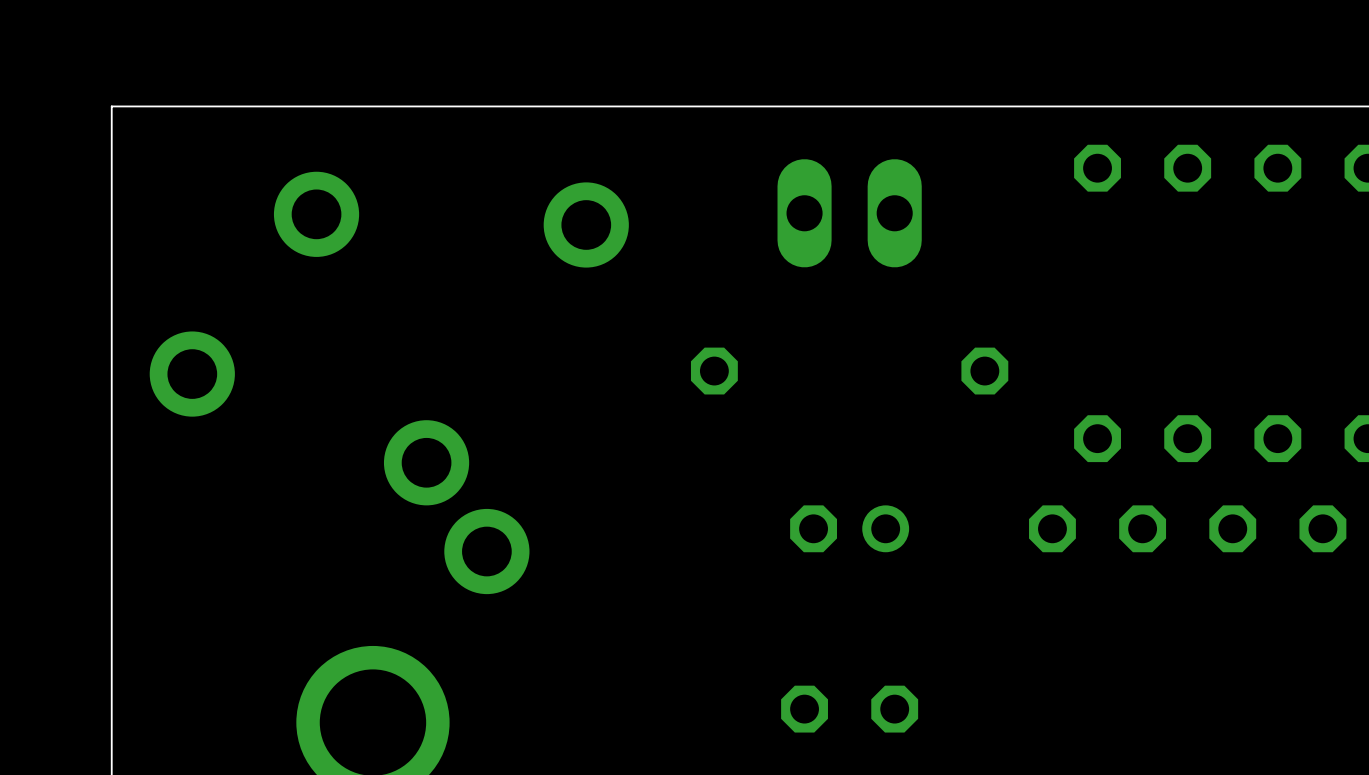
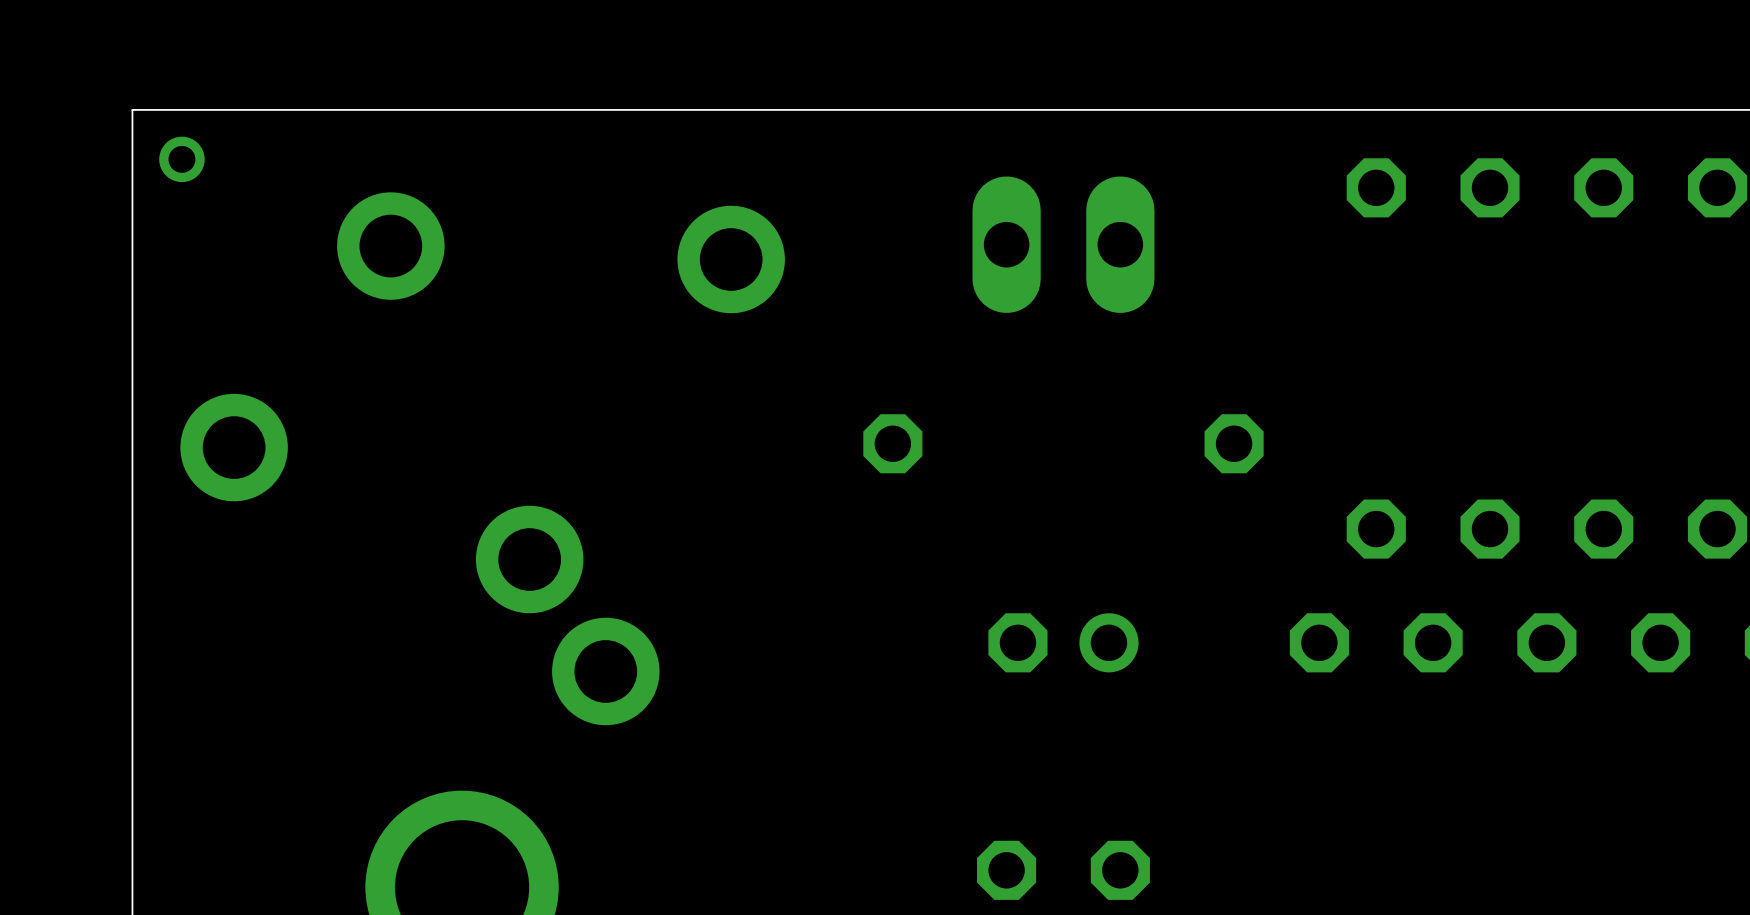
via: none -> (181, 159)

